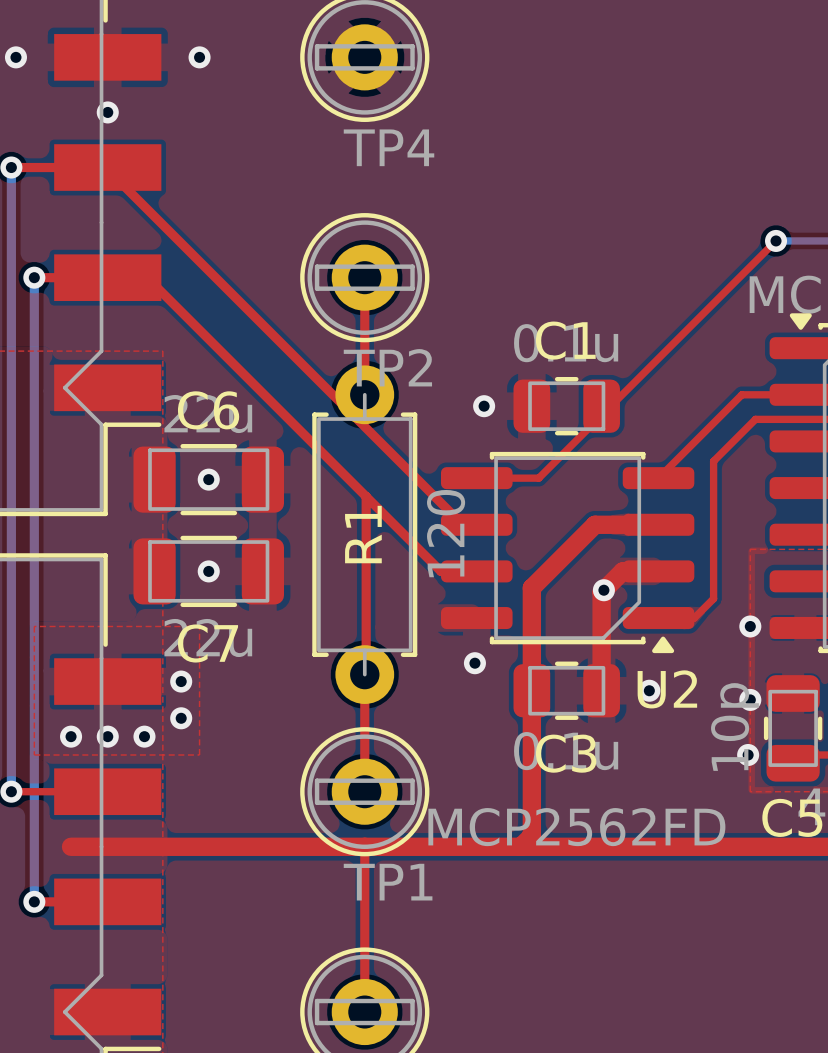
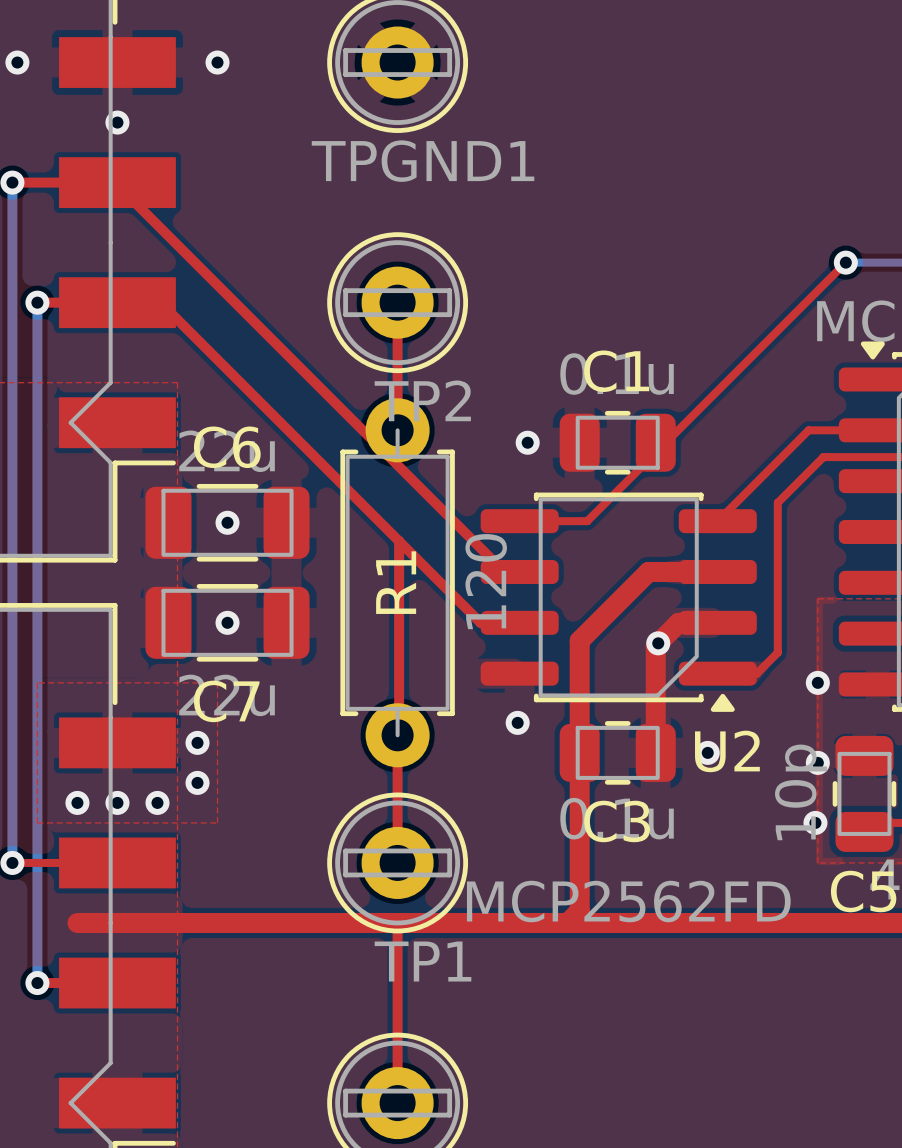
TP4 name: TP4 (389, 147) -> TPGND1 (423, 161)

